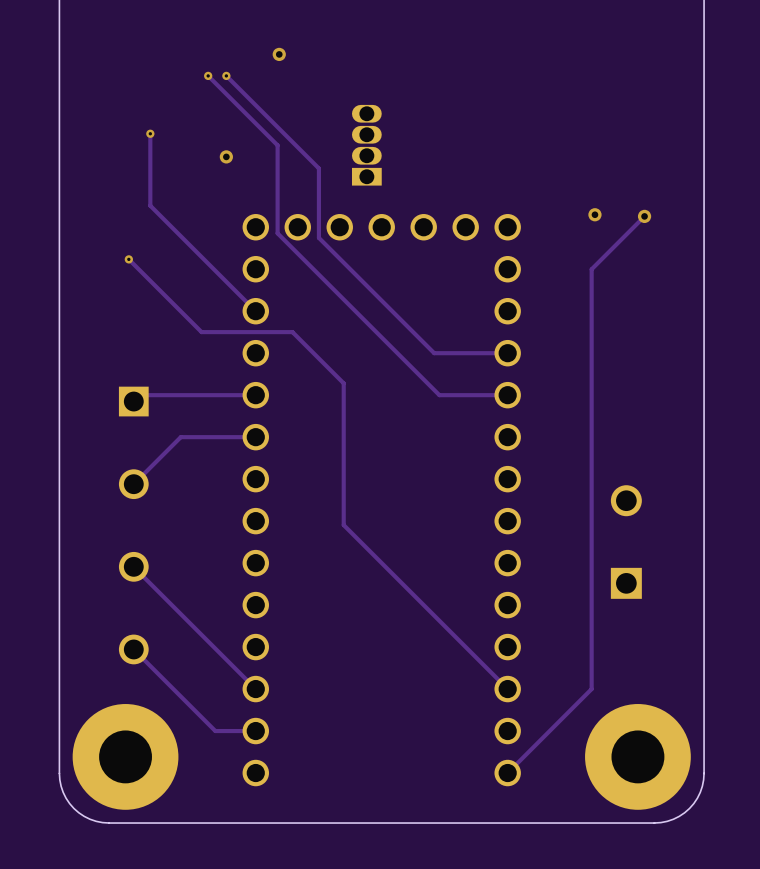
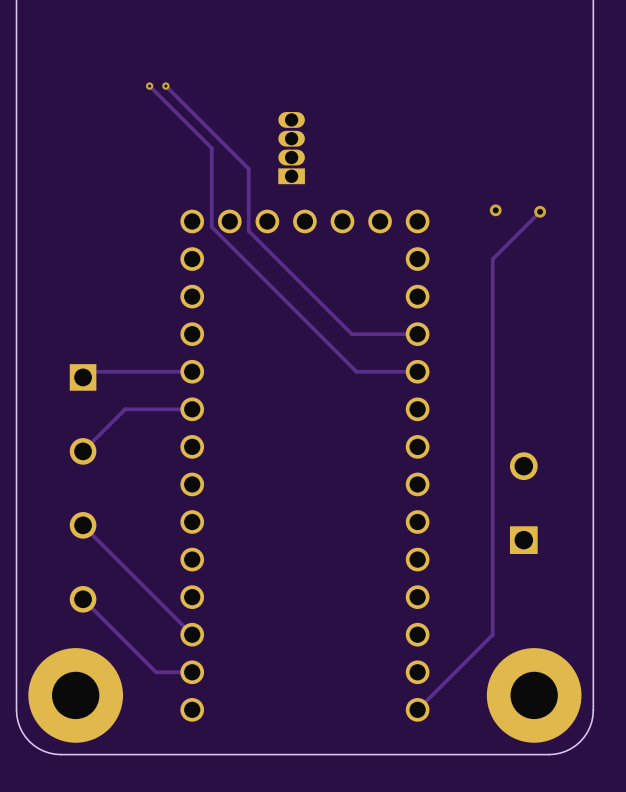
via: (279, 54) -> none
track: (150, 133) (150, 205) (255, 311) -> none
via: (150, 133) -> none
via: (226, 156) -> none
track: (128, 259) (201, 332) (292, 332) (343, 383) (343, 525) (507, 689) -> none
via: (128, 259) -> none

